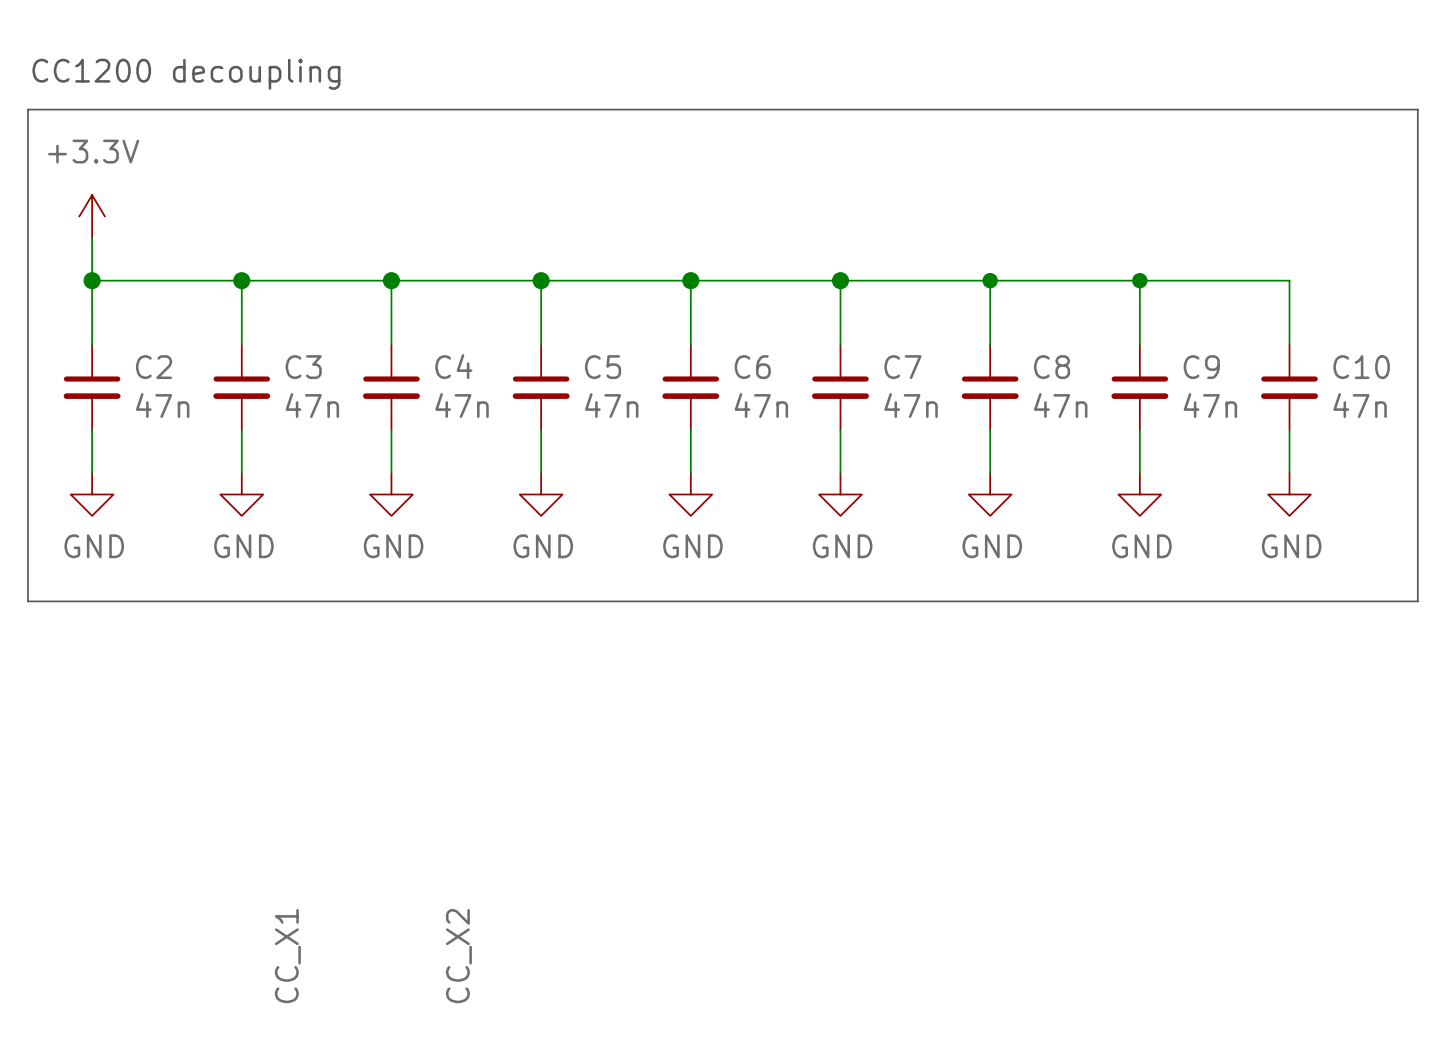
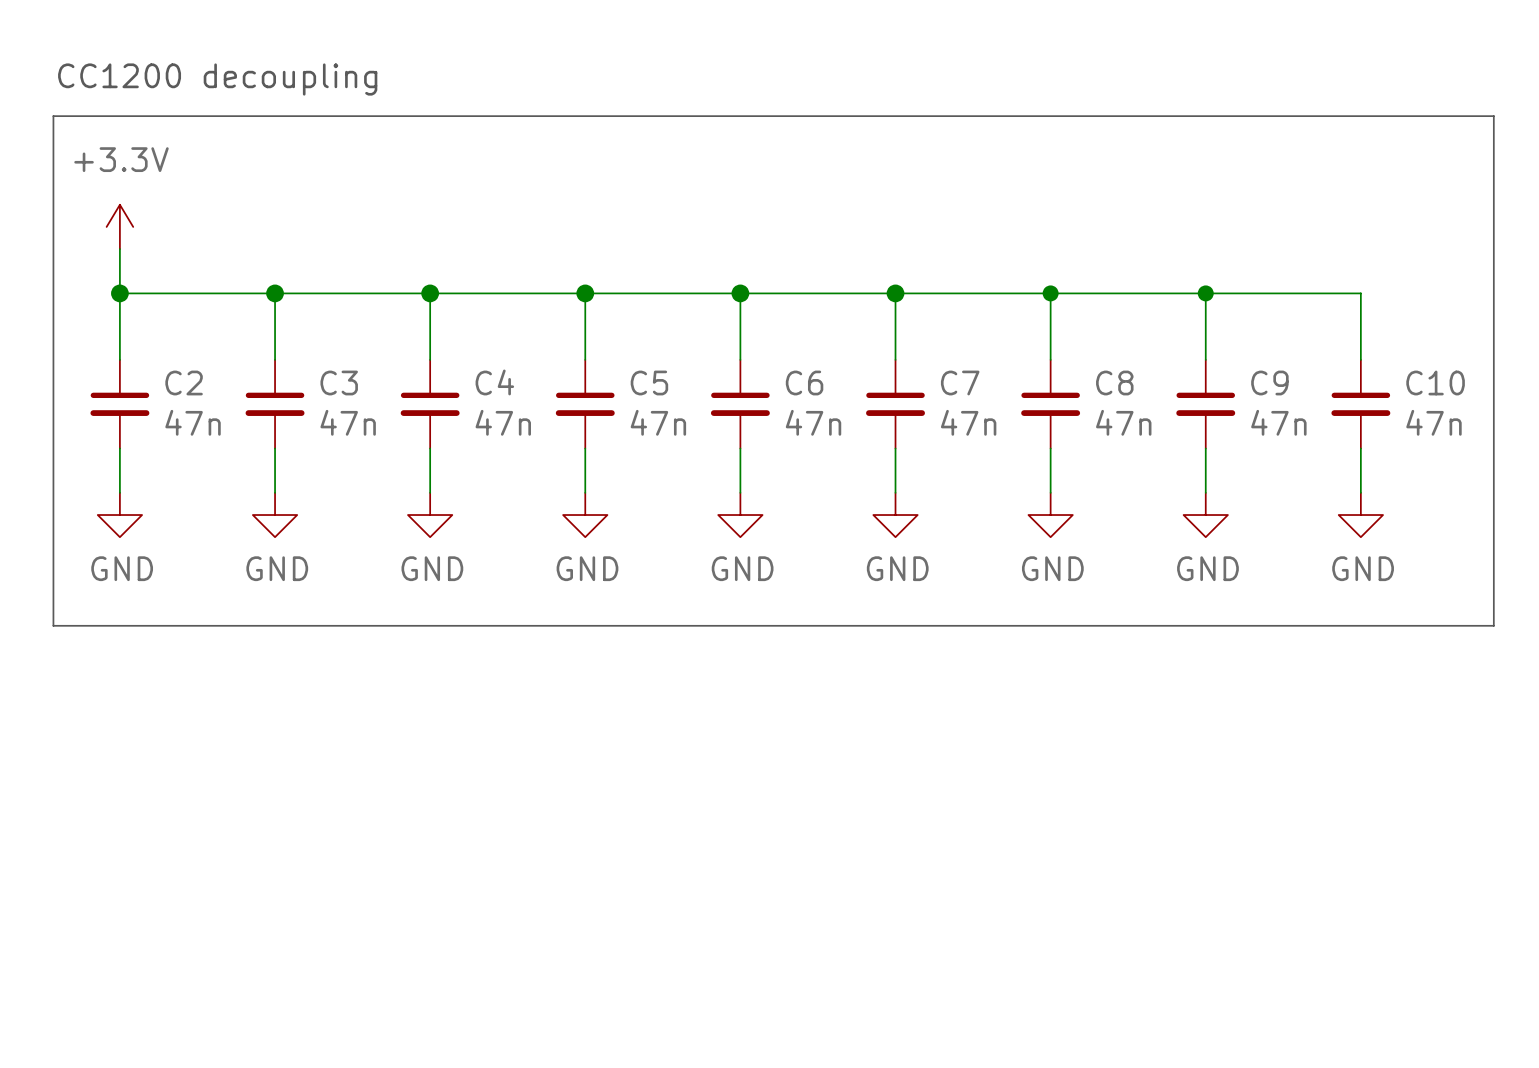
label: CC_X1 (287, 956) -> none
label: CC_X2 (458, 956) -> none

